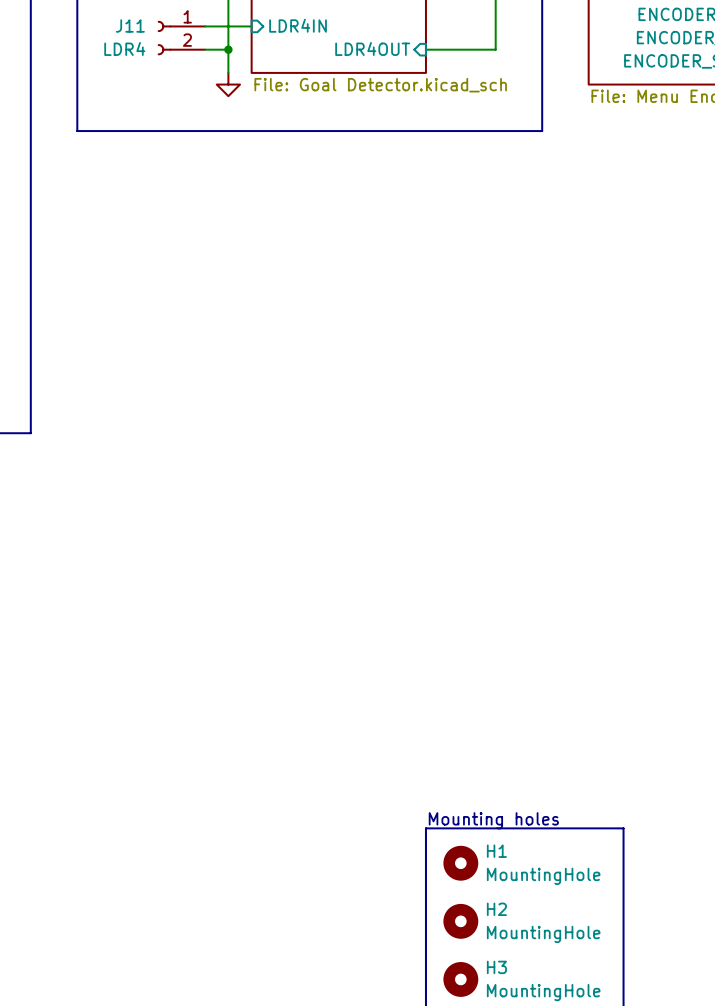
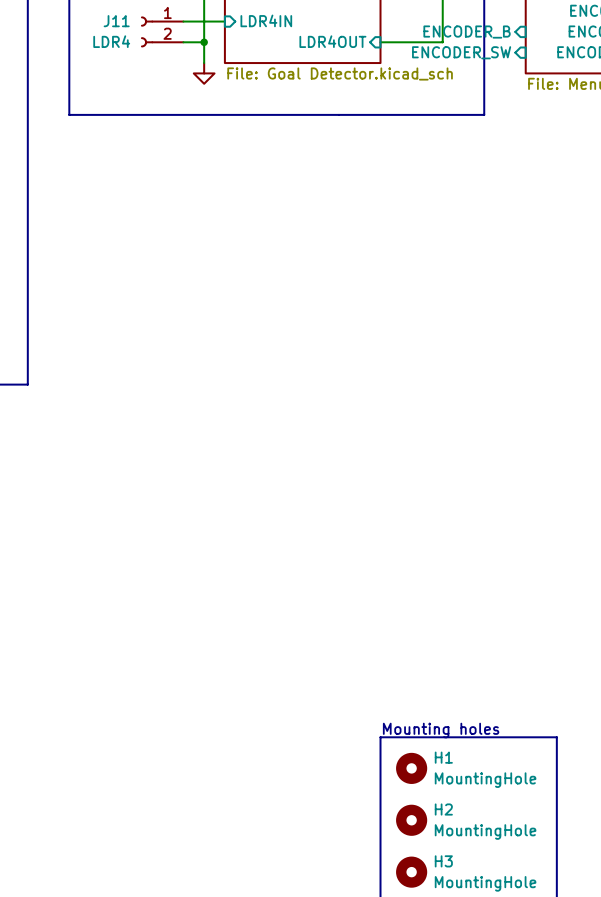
sheet pin: none -> ENCODER_B (467, 32)
sheet pin: none -> ENCODER_SW (461, 52)

